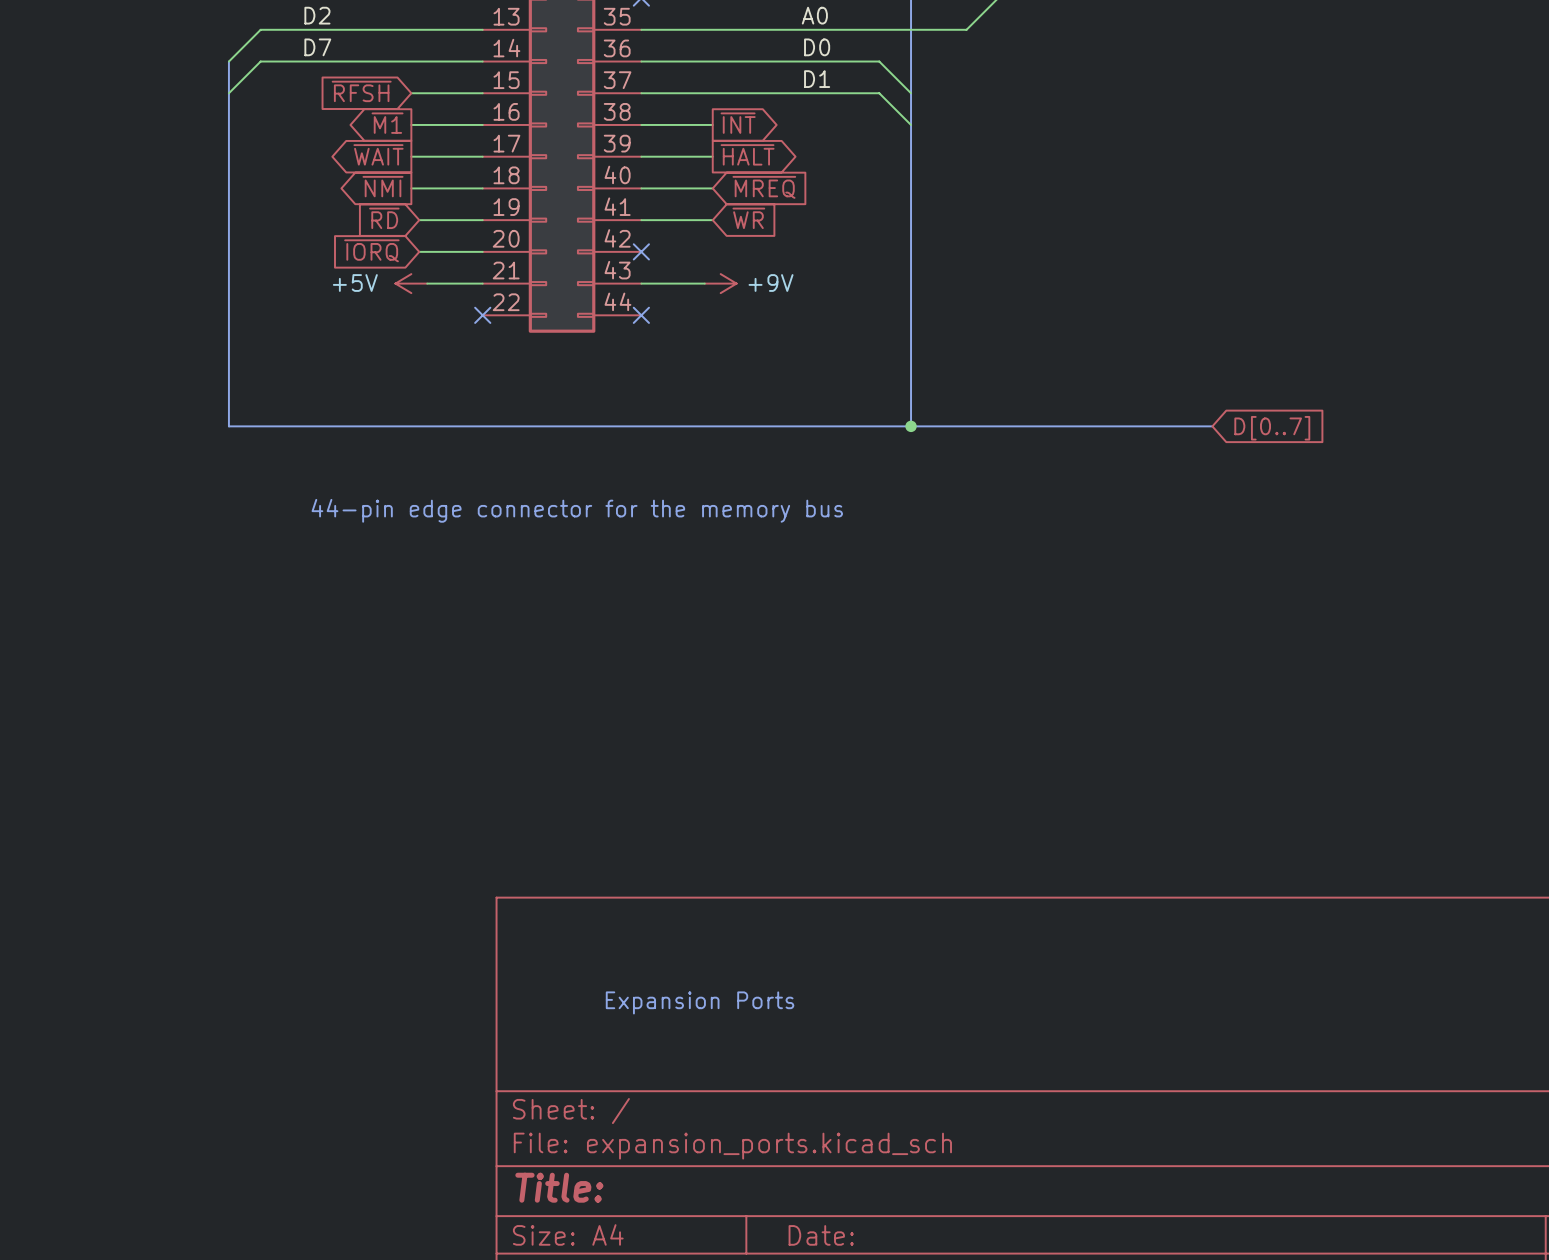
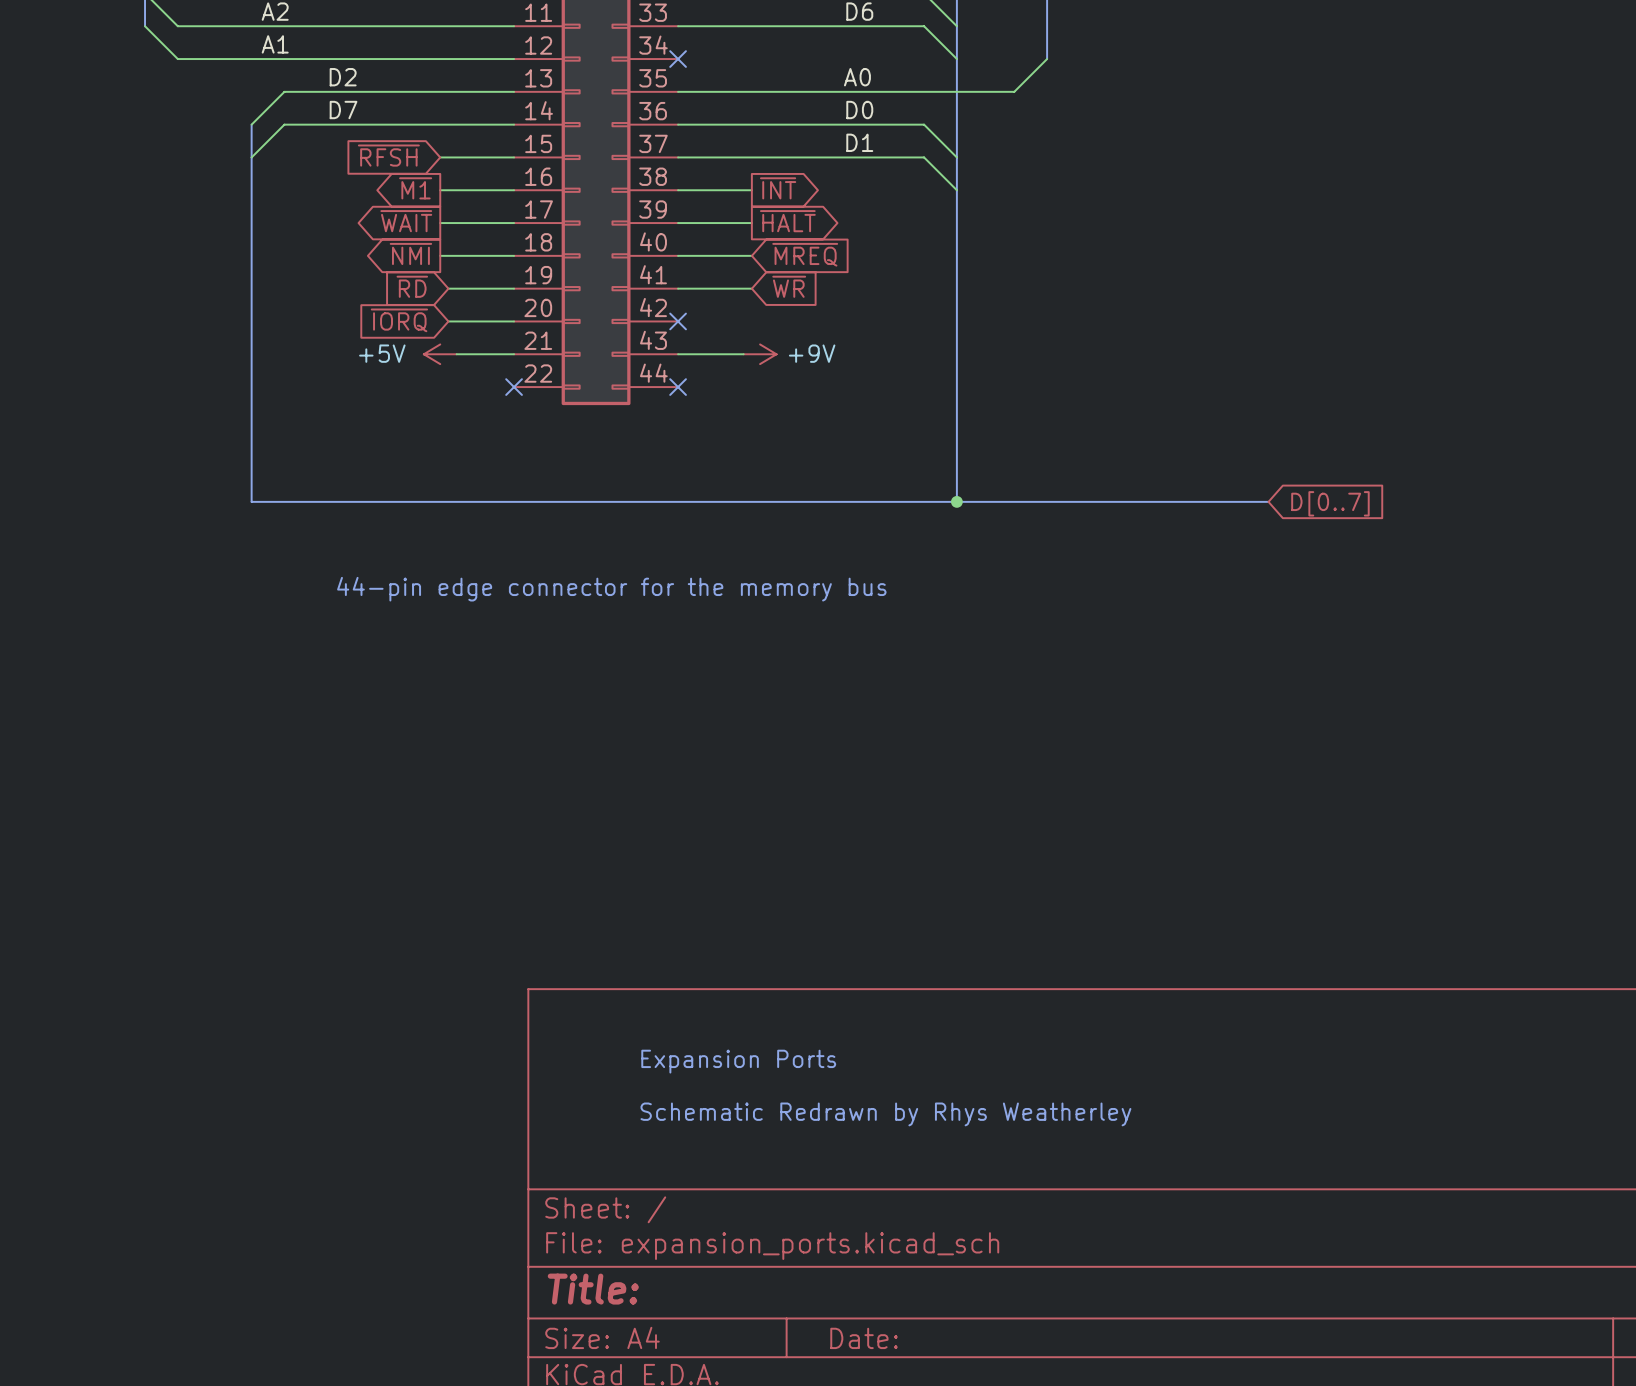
text position: Expansion Ports (700, 1002) -> Expansion Ports (738, 1061)
text: none -> Schematic Redrawn by Rhys Weatherley (885, 1114)

